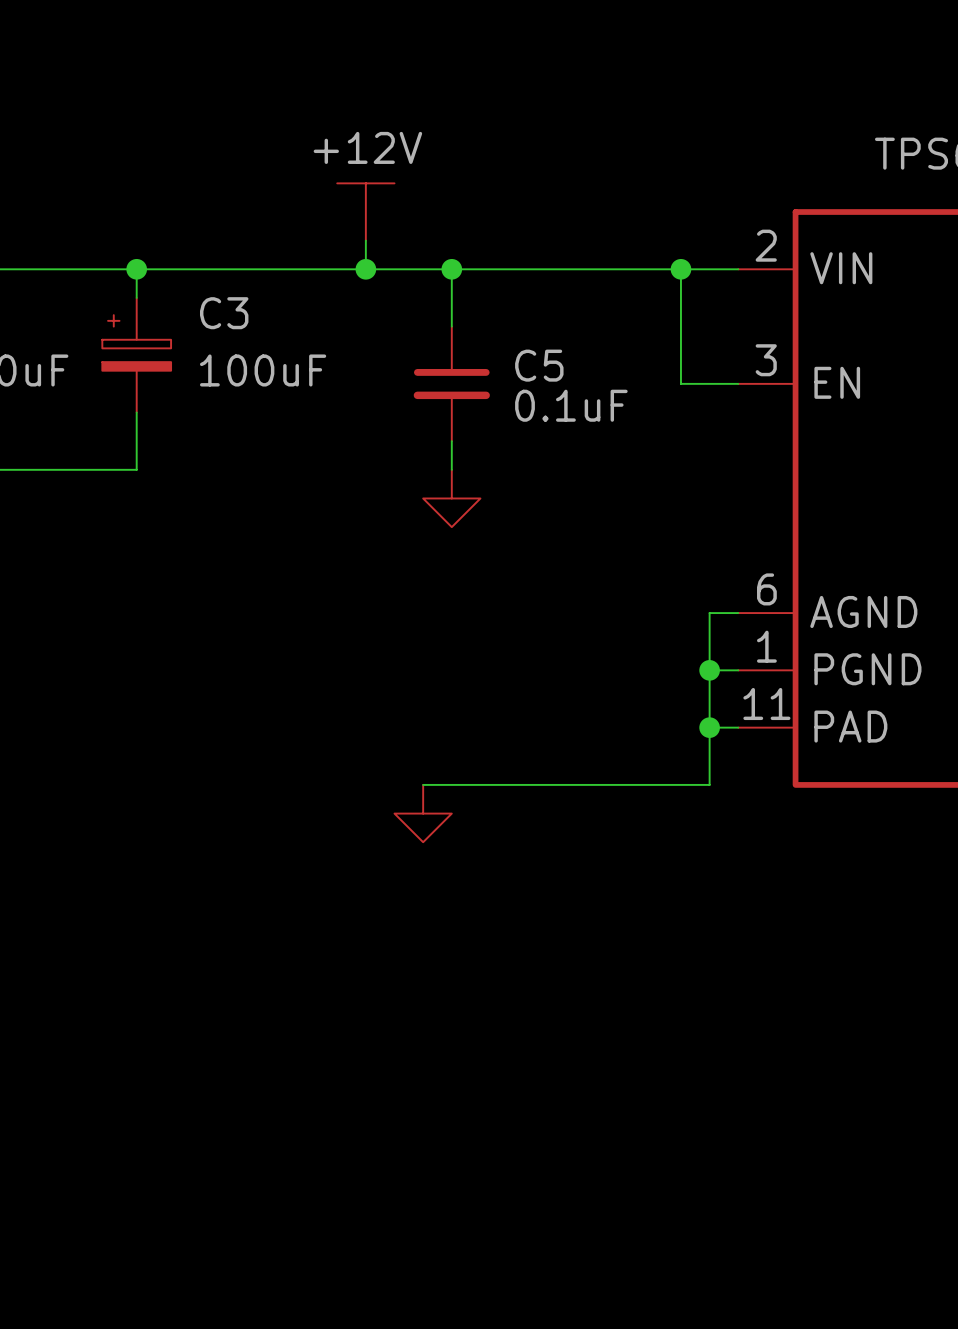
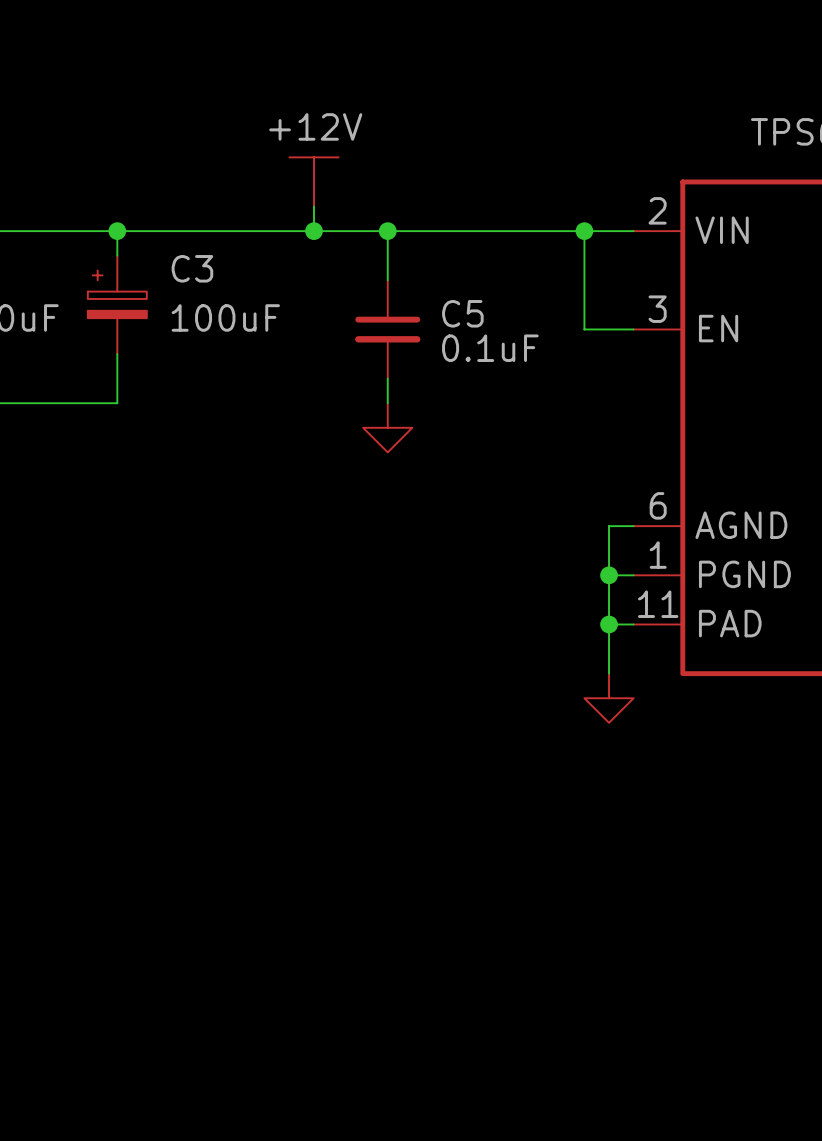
wire: (423, 784) (709, 784) -> none
power symbol position: (423, 813) -> (609, 698)

